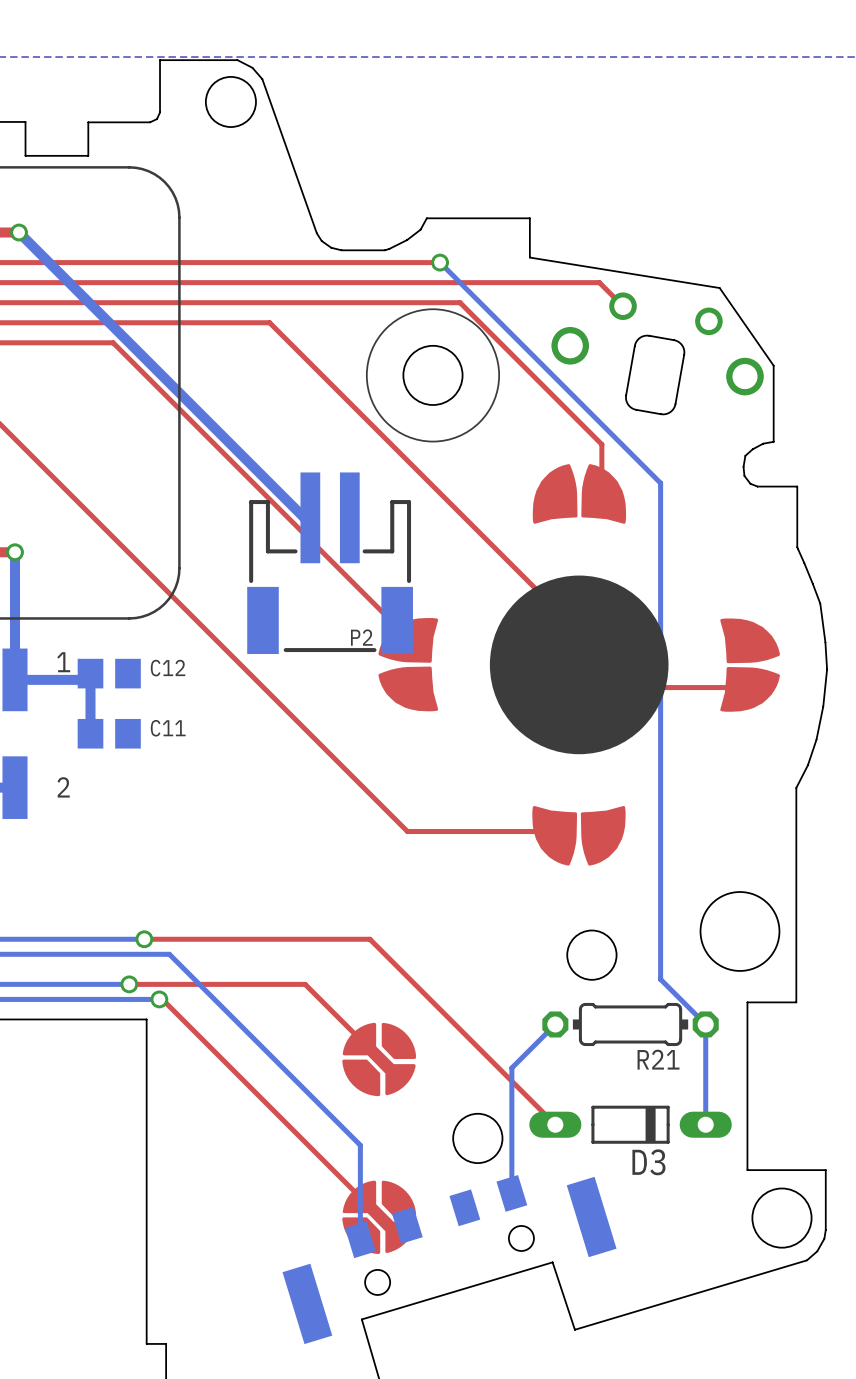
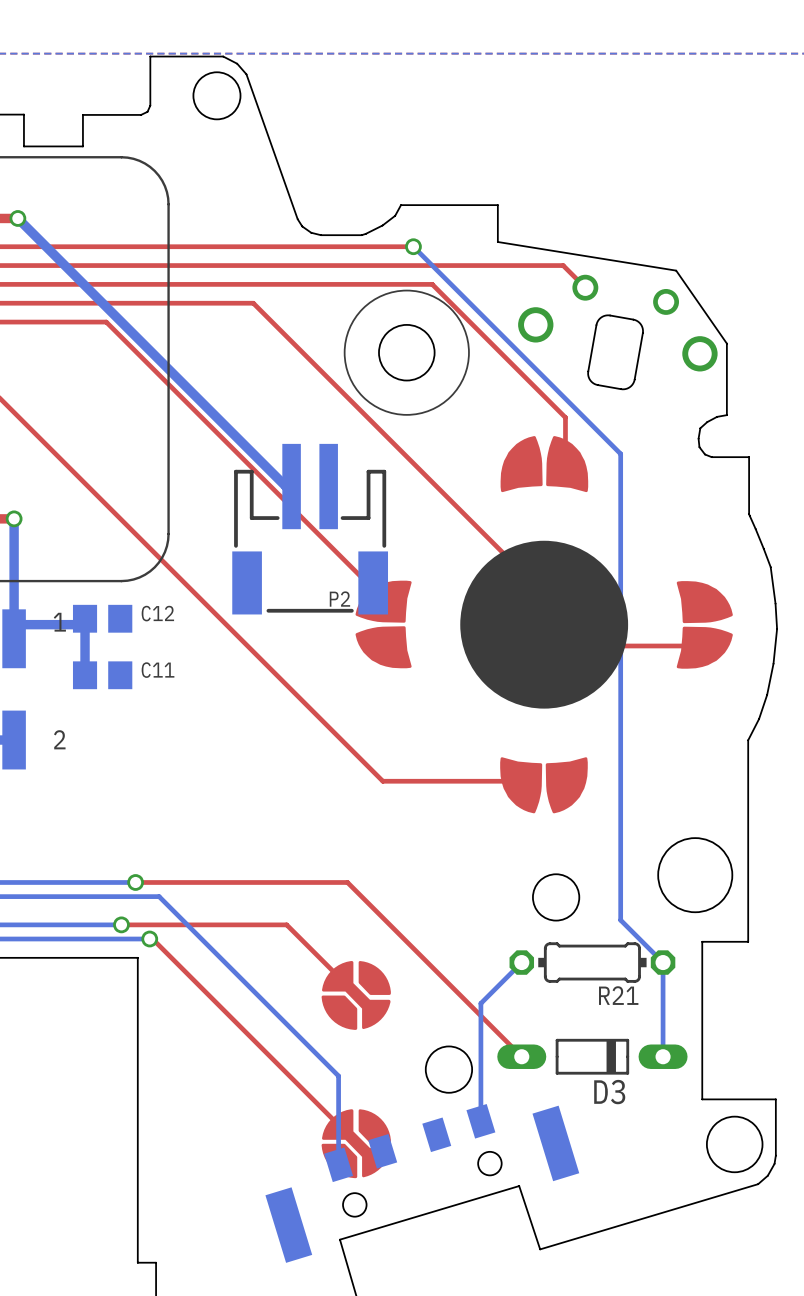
bottom track: (15, 664) (15, 679) (85, 679) (88, 678) (90, 673) -> (14, 624) (79, 624) (85, 618) (85, 632)
C12 position: (109, 673) -> (102, 618)
C11 position: (109, 733) -> (102, 675)

